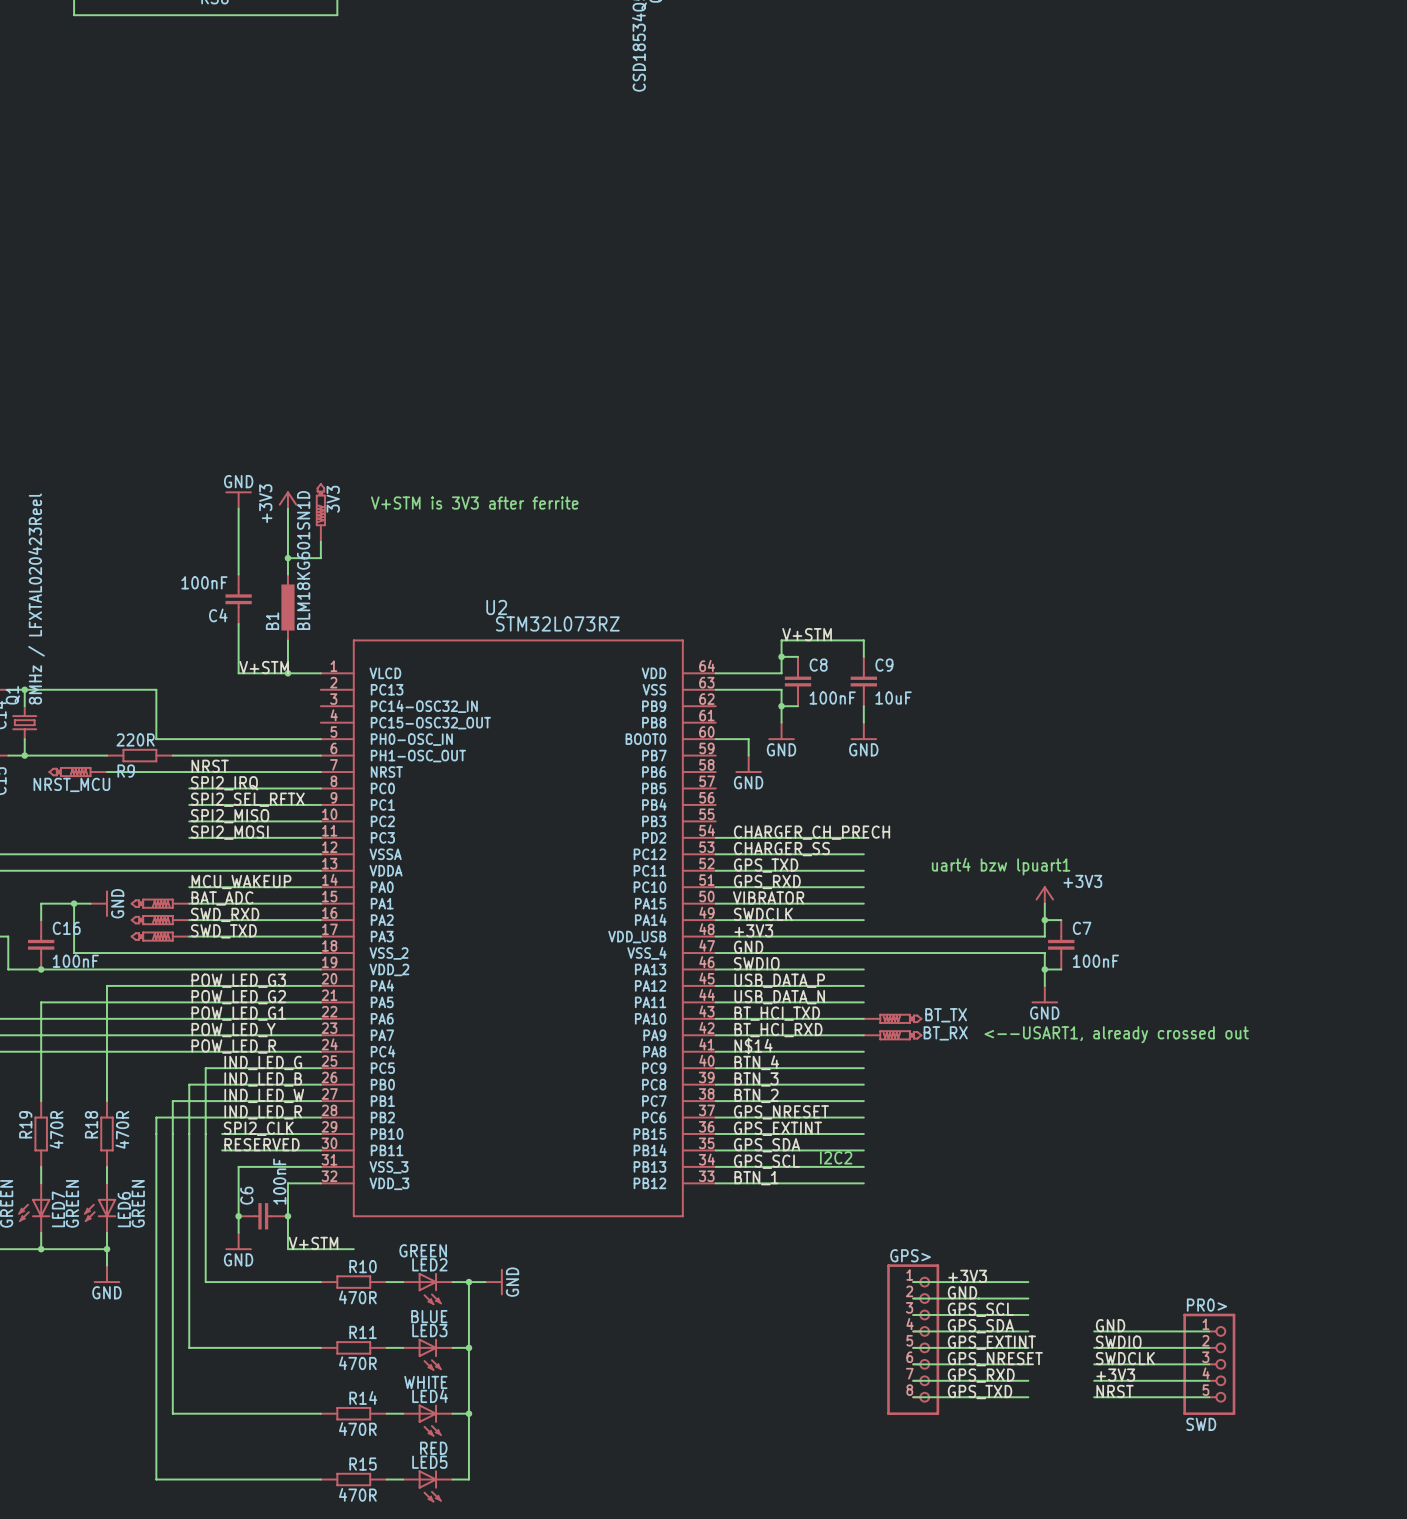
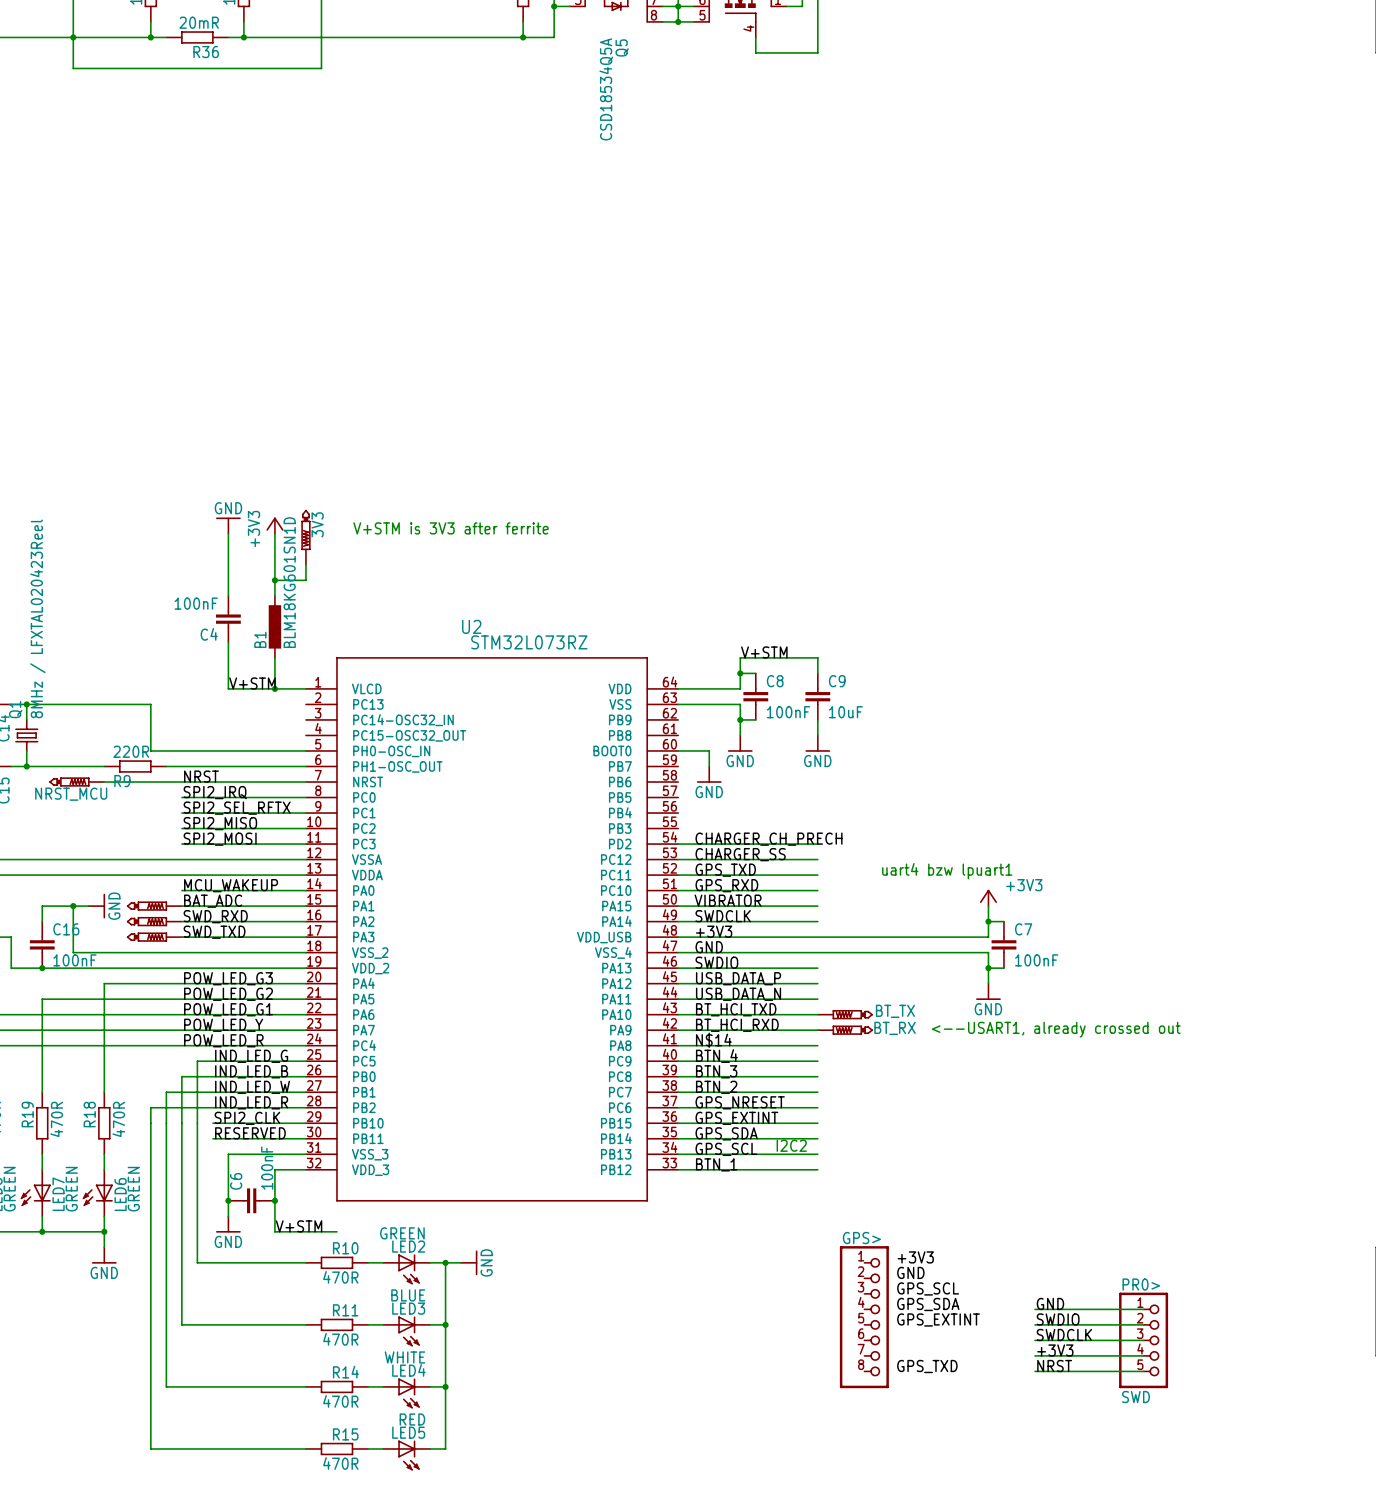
wire: (913, 1282) (1028, 1282) -> none
wire: (913, 1298) (1028, 1298) -> none
wire: (913, 1314) (1028, 1314) -> none
wire: (913, 1331) (1028, 1331) -> none
wire: (913, 1347) (1028, 1347) -> none
label: GPS_NRESET (995, 1359) -> none
wire: (913, 1364) (1028, 1364) -> none
label: GPS_RXD (981, 1375) -> none
wire: (913, 1380) (1028, 1380) -> none
wire: (913, 1397) (1028, 1397) -> none

